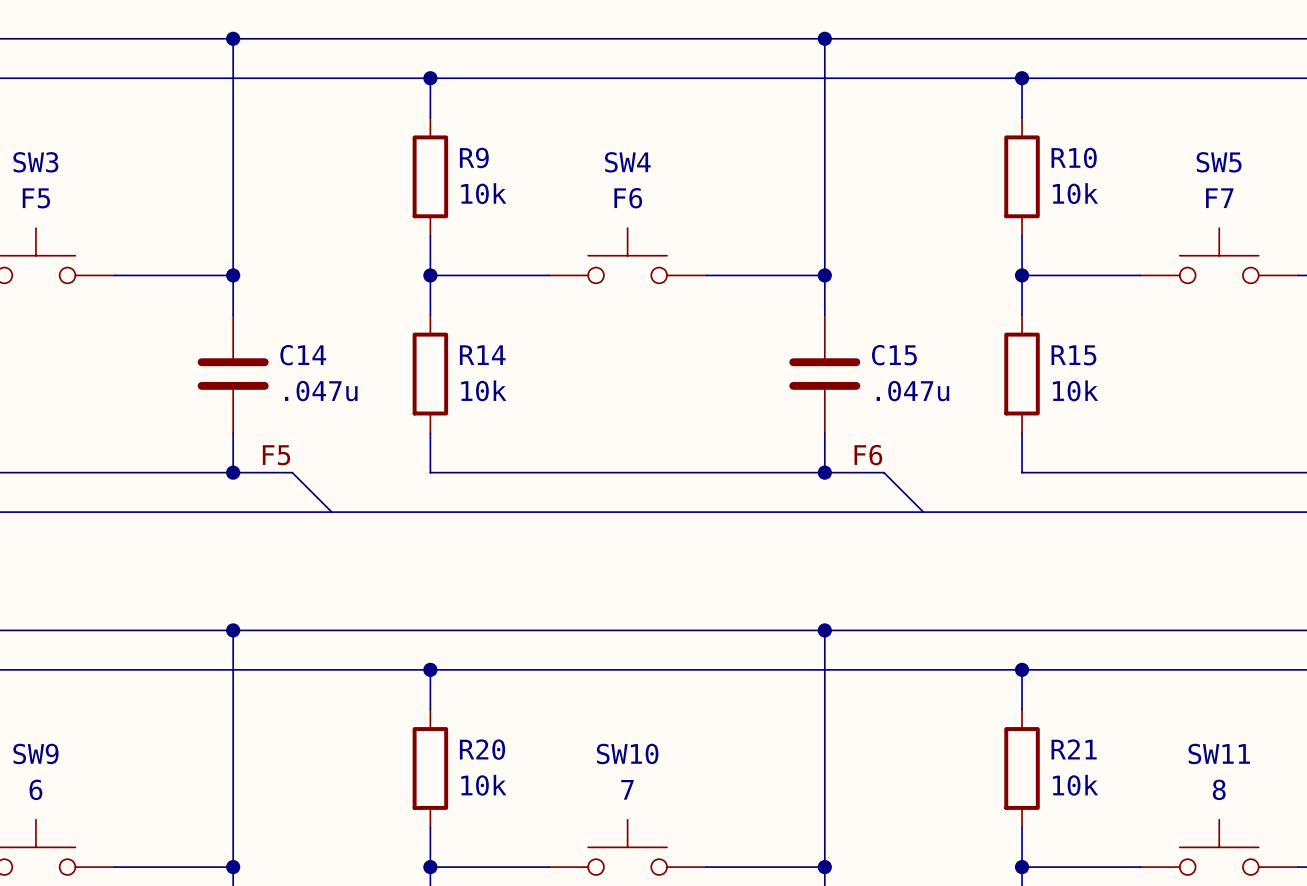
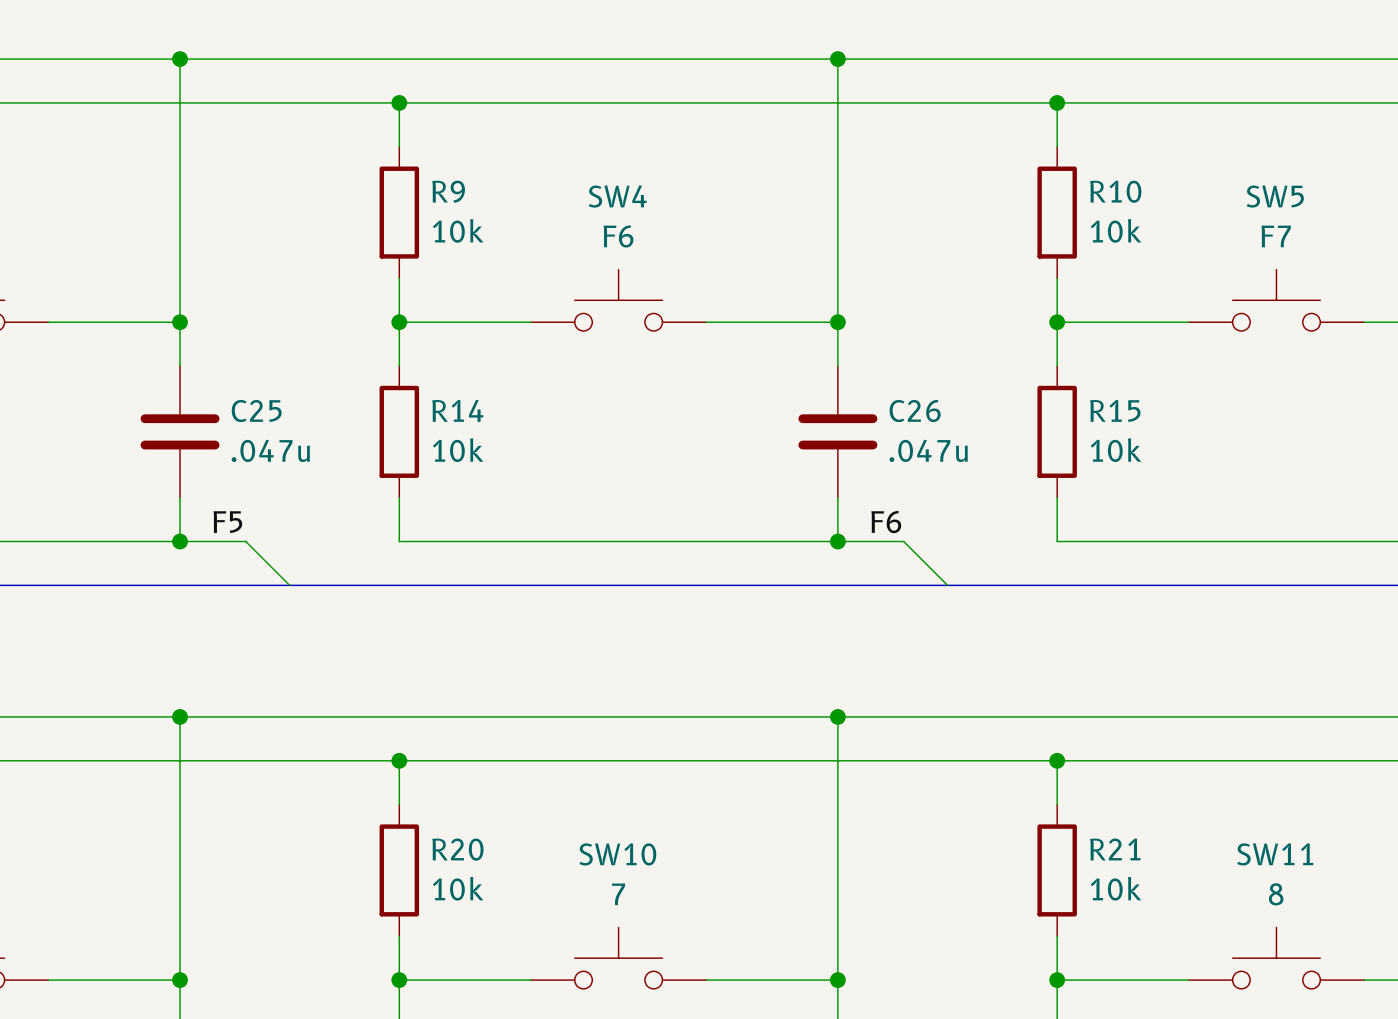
C14 name: C14 (303, 355) -> C25 (256, 411)
C15 name: C15 (894, 355) -> C26 (915, 411)

